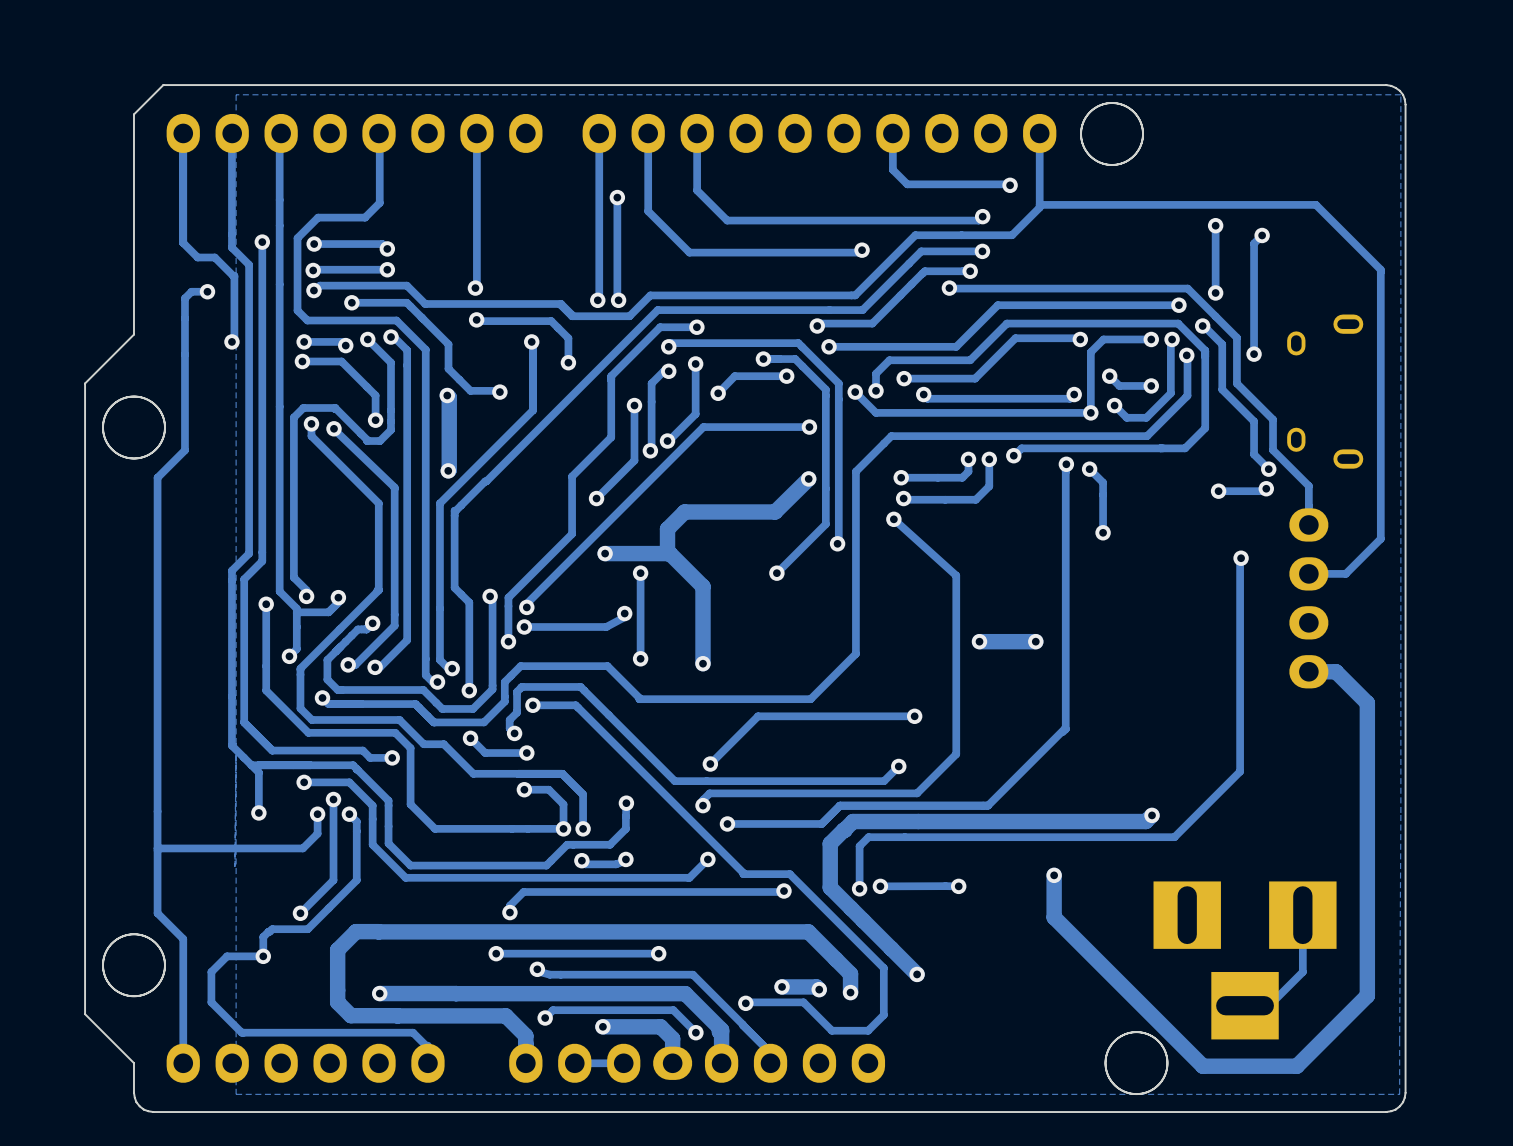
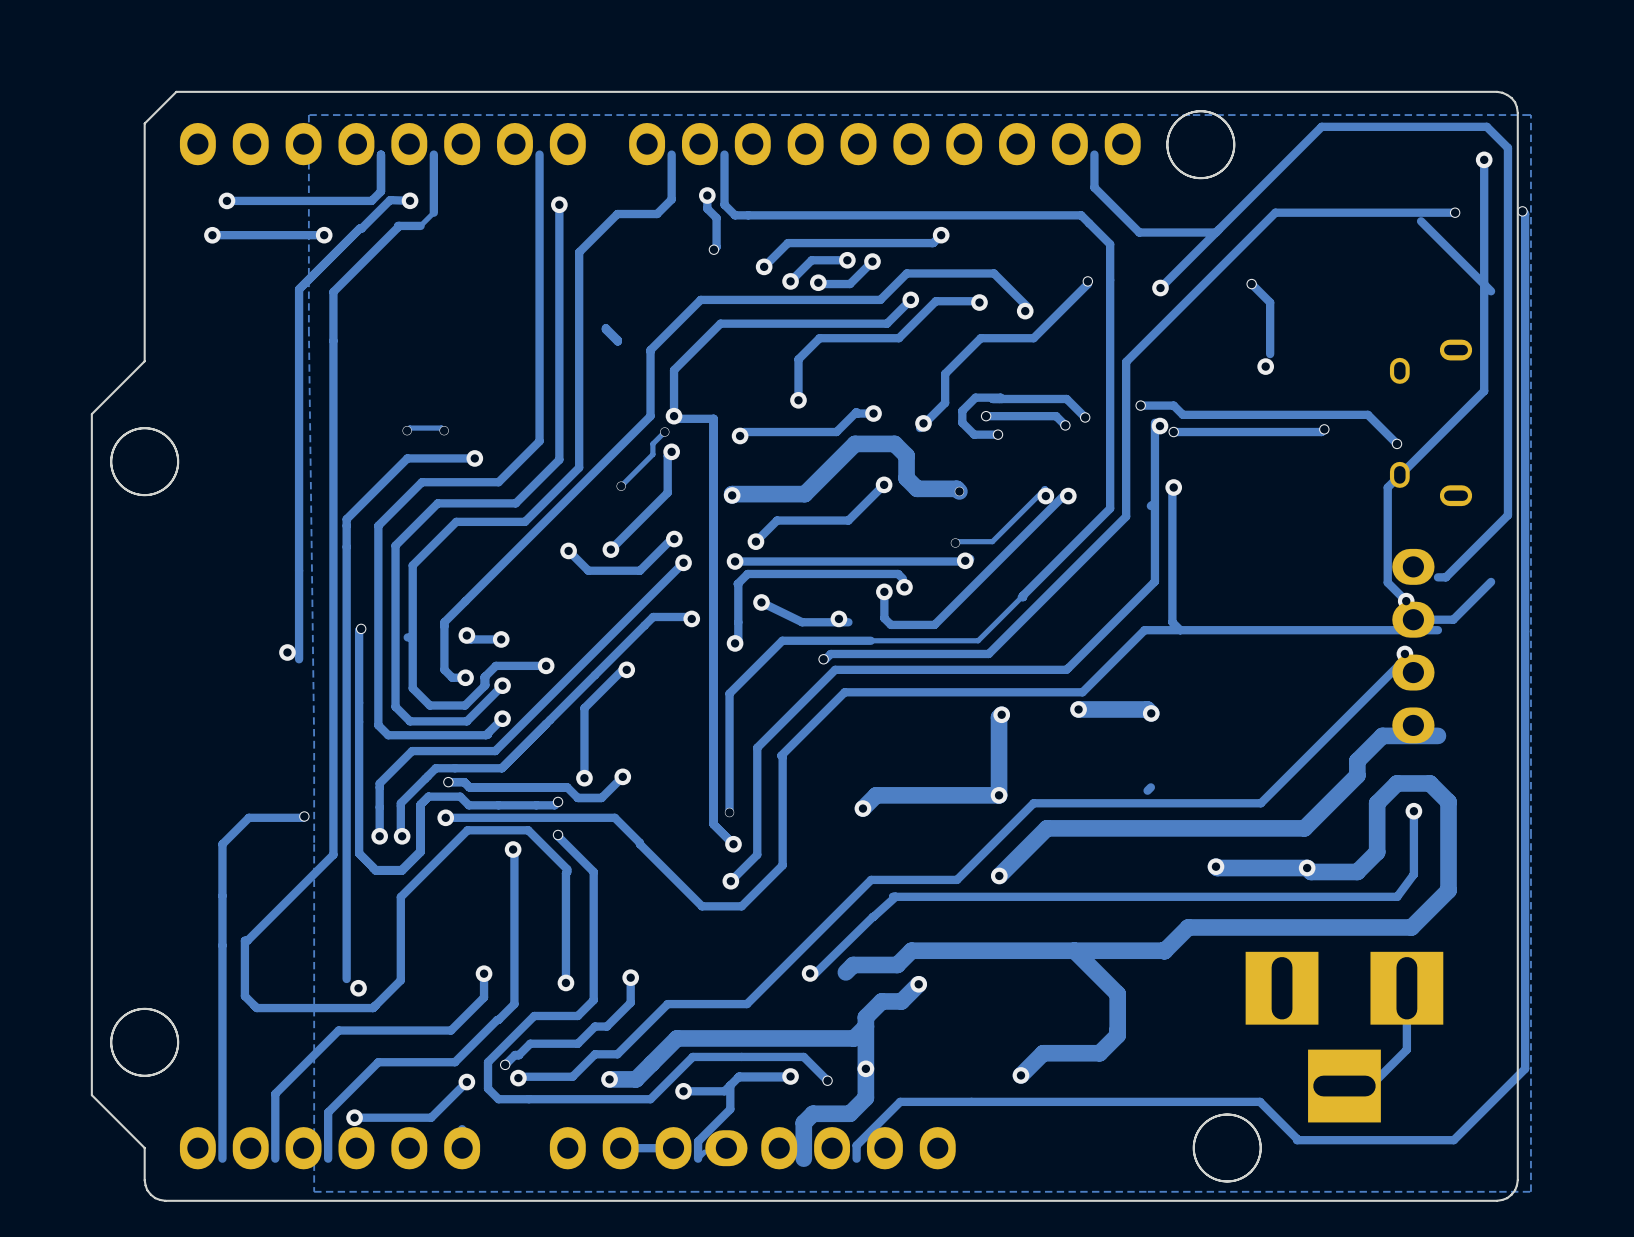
zone outline: (1400, 94) (1399, 1094) (236, 1094) (236, 94) (1400, 94) -> (1530, 115) (1530, 1191) (314, 1191) (314, 741) (308, 329) (308, 115) (1530, 115)
track: (183, 133) (183, 242) (197, 257) (214, 257) (234, 275) (234, 339) (231, 341) -> none
track: (231, 133) (231, 247) (249, 264) (249, 553) (231, 570) (231, 745) (258, 772) (258, 812) (260, 811) -> none
track: (379, 133) (379, 202) (365, 217) (318, 217) (297, 238) (297, 310) (307, 320) (396, 320) (425, 349) (425, 675) (432, 682) (437, 682) -> none
track: (476, 133) (475, 288) -> none
track: (599, 133) (597, 300) -> none
track: (648, 133) (648, 211) (689, 252) (859, 252) (862, 250) -> none
track: (697, 133) (697, 190) (727, 220) (978, 220) (982, 216) -> none
track: (892, 133) (892, 169) (907, 184) (1010, 185) -> none
track: (1039, 133) (1039, 207) (1012, 235) (915, 235) (855, 295) (650, 295) (629, 316) (572, 316) -> none
track: (281, 134) (279, 134) (279, 591) (296, 608) (296, 649) (289, 656) -> none
track: none -> (381, 154) (381, 191) (371, 200) (226, 200)
track: none -> (539, 154) (539, 441) (498, 482) (421, 482) (378, 525) (378, 725) (388, 735) (486, 735) (502, 718)
track: none -> (671, 154) (671, 199) (657, 214) (617, 214) (579, 252) (579, 467) (525, 521) (456, 521) (412, 565) (412, 688) (429, 705) (465, 705) (485, 685) (485, 676)
track: none -> (1094, 154) (1094, 187) (1139, 232) (1215, 232)
track: none -> (1484, 159) (1484, 391) (1387, 487) (1387, 582) (1406, 601)
via: none -> (1484, 159)
track: none -> (707, 195) (707, 208) (716, 217) (716, 247) (713, 249)
track: none -> (410, 200) (390, 200) (299, 289) (299, 659)
via: none -> (410, 200)
via: (1010, 185) -> none
via: none -> (226, 200)
track: none -> (559, 204) (559, 459) (515, 503) (437, 503) (395, 545) (395, 706) (410, 721) (466, 721) (502, 685)
via: none -> (559, 204)
track: none -> (724, 204) (735, 215) (1081, 215) (1110, 244) (1110, 508) (978, 640) (782, 640) (729, 693) (729, 812)
track: none -> (724, 204) (724, 154) (724, 204)
track: none -> (1522, 211) (1525, 214) (1525, 1068) (1453, 1140) (1297, 1140) (1260, 1101) (900, 1101) (856, 1145) (856, 1158)
via: none -> (1522, 211)
track: none -> (433, 212) (433, 154) (433, 212)
track: none -> (433, 212) (420, 225) (398, 225) (333, 291) (333, 854) (247, 940) (244, 940)
track: none -> (1455, 212) (1275, 212) (1126, 362) (1126, 516) (988, 653) (830, 653) (823, 659)
via: none -> (1455, 212)
track: (617, 197) (618, 300) -> none
via position: (617, 197) -> (707, 195)
track: (1315, 204) (1039, 204) -> none
via: (982, 216) -> none
via: none -> (212, 235)
track: none -> (324, 235) (212, 235)
via: none -> (324, 235)
track: none -> (941, 235) (933, 243) (787, 243) (764, 266)
via: none -> (941, 235)
track: (1215, 225) (1215, 292) -> none
via: (1215, 225) -> none
via: none -> (713, 249)
track: (1262, 235) (1254, 243) (1254, 354) -> none
via: (1262, 235) -> none
track: none -> (847, 260) (811, 260) (790, 281)
via: none -> (847, 260)
track: (262, 242) (262, 561) (244, 579) (244, 722) (272, 750) (362, 750) (370, 757) (392, 757) -> none
via: (262, 242) -> none
track: none -> (872, 261) (850, 284) (818, 282)
via: none -> (872, 261)
track: (314, 244) (382, 244) (387, 248) -> none
via: (314, 244) -> none
via: none -> (764, 266)
via: (387, 248) -> none
via: (862, 250) -> none
track: (982, 251) (921, 251) (862, 310) (657, 310) (454, 510) (454, 587) (469, 602) (469, 690) -> none
via: (982, 251) -> none
via: none -> (790, 281)
track: none -> (1087, 281) (1087, 284) (1033, 338) (980, 338) (945, 373) (945, 402) (920, 428)
via: none -> (1087, 281)
via: none -> (818, 282)
track: none -> (1251, 284) (1270, 302) (1270, 354)
via: none -> (1251, 284)
track: none -> (1160, 288) (1321, 126) (1486, 126) (1507, 147) (1507, 515) (1445, 577) (1437, 577)
via: none -> (1160, 288)
track: (387, 269) (313, 270) -> none
via: (387, 269) -> none
track: (1380, 269) (1380, 538) -> none
via: (313, 270) -> none
track: (970, 271) (924, 271) (922, 273) -> none
via: (970, 271) -> none
track: (922, 273) (872, 323) (819, 323) (817, 326) -> none
track: none -> (910, 299) (887, 323) (720, 323) (674, 370) (674, 416) (676, 418) (713, 418) (713, 824) (733, 844)
via: none -> (910, 299)
track: none -> (979, 302) (935, 301) (898, 338) (819, 338) (798, 359) (798, 400)
via: none -> (979, 302)
track: none -> (1027, 306) (994, 273) (906, 273) (880, 299) (700, 299) (650, 350) (650, 416) (444, 622) (444, 669) (452, 677) (465, 677) (465, 681)
via: (475, 288) -> none
track: (949, 288) (1187, 288) (1236, 337) (1236, 383) (1273, 419) (1273, 450) (1308, 486) (1308, 524) -> none
track: (313, 290) (320, 285) (406, 285) (425, 303) (561, 303) -> none
via: (313, 290) -> none
track: (207, 291) (191, 291) (184, 298) (184, 450) (157, 477) (157, 913) (183, 938) (183, 1063) -> none
via: (207, 291) -> none
via: (1215, 292) -> none
via: (597, 300) -> none
via: (618, 300) -> none
track: (349, 302) (406, 302) (448, 344) (448, 368) (470, 390) (499, 392) -> none
via: (351, 302) -> none
track: (1178, 305) (997, 305) (956, 346) (829, 346) -> none
via: (1178, 305) -> none
track: (476, 319) (551, 321) (568, 338) (568, 362) (567, 361) -> none
via: (476, 319) -> none
via: (817, 326) -> none
track: (1202, 326) (1222, 344) (1222, 389) (1254, 421) (1254, 454) (1268, 469) -> none
via: (1202, 326) -> none
track: (696, 327) (660, 327) (611, 376) (611, 437) (572, 476) (572, 534) (508, 597) (508, 641) -> none
via: (696, 327) -> none
track: (391, 337) (393, 337) (407, 350) (407, 640) (380, 667) (375, 667) -> none
via: (391, 337) -> none
track: (367, 339) (391, 362) (391, 430) (380, 441) (367, 441) (335, 407) -> none
via: (367, 339) -> none
track: (1080, 339) (1015, 338) (975, 378) (904, 378) -> none
via: (1080, 339) -> none
track: (1151, 339) (1103, 339) (1090, 352) (1090, 412) (876, 412) (855, 392) -> none
via: (1151, 339) -> none
track: (1172, 339) (1170, 393) (1146, 417) (1126, 417) (1114, 405) -> none
via: (231, 341) -> none
track: (304, 341) (342, 341) (345, 345) -> none
via: (304, 341) -> none
track: (531, 341) (532, 410) (439, 503) (439, 660) (448, 668) (452, 668) -> none
via: (531, 341) -> none
via: (345, 345) -> none
track: (668, 346) (671, 343) (798, 343) (838, 383) (837, 543) -> none
via: (668, 346) -> none
via: (829, 346) -> none
via: (1254, 354) -> none
track: (1186, 355) (1187, 395) (1147, 436) (891, 436) (855, 471) (855, 653) (810, 699) (639, 699) (607, 666) (520, 666) (504, 682) (504, 701) (483, 722) (433, 722) (415, 704) (328, 704) (322, 697) -> none
via: (1186, 355) -> none
track: (763, 359) (795, 359) (825, 389) (825, 524) (776, 573) -> none
via: (763, 359) -> none
track: (302, 361) (341, 361) (375, 395) (375, 420) -> none
via: (302, 361) -> none
via: (568, 362) -> none
track: (695, 362) (695, 414) (667, 441) -> none
via: (695, 363) -> none
track: none -> (992, 398) (1066, 398) (1085, 417)
track: none -> (1001, 398) (975, 397) (962, 410) (962, 422) (974, 434) (997, 434)
via: none -> (798, 400)
track: (668, 371) (663, 371) (651, 383) (650, 450) -> none
via: (668, 371) -> none
track: none -> (1140, 405) (1173, 405) (1182, 414) (1367, 414) (1396, 443)
via: none -> (1140, 405)
track: (786, 376) (734, 376) (718, 393) -> none
via: (786, 376) -> none
track: (1109, 376) (1119, 385) (1151, 385) -> none
via: (1109, 376) -> none
via: (904, 378) -> none
track: none -> (873, 413) (856, 412) (836, 432) (744, 432) (740, 435)
via: none -> (873, 413)
via: none -> (674, 416)
track: none -> (986, 416) (1056, 416) (1065, 425)
via: none -> (986, 416)
via: (1151, 385) -> none
via: none -> (1085, 417)
track: (876, 390) (876, 373) (889, 360) (970, 360) (1006, 323) (1178, 323) (1205, 350) (1205, 428) (1185, 448) (1021, 448) (1013, 455) -> none
via: (876, 390) -> none
track: none -> (1154, 422) (1154, 581) (1068, 668)
via: (499, 392) -> none
via: (718, 393) -> none
via: none -> (1065, 425)
via: (923, 394) -> none
track: (1074, 394) (1069, 398) (927, 398) (923, 394) -> none
track: (447, 395) (449, 397) (448, 470) -> none
via: (447, 395) -> none
track: none -> (1324, 429) (1321, 432) (1173, 432)
via: none -> (1324, 429)
via: none -> (407, 430)
track: none -> (444, 430) (441, 428) (409, 428) (407, 430)
via: none -> (444, 430)
track: none -> (664, 432) (652, 443) (652, 454) (621, 486)
via: none -> (664, 432)
via: none -> (1173, 432)
via: none -> (997, 434)
via: none -> (740, 435)
track: (634, 405) (634, 460) (596, 498) -> none
via position: (634, 405) -> (671, 451)
via: (1114, 405) -> none
track: (335, 407) (303, 407) (293, 417) (293, 577) (306, 590) (306, 596) -> none
via: none -> (1396, 443)
via: (1090, 412) -> none
track: none -> (671, 451) (667, 455) (667, 492) (610, 549)
via: (375, 420) -> none
track: (311, 423) (311, 436) (378, 503) (378, 590) (300, 668) (300, 708) (311, 719) (399, 719) (423, 744) (443, 744) (473, 773) (562, 773) (583, 794) (583, 828) -> none
via: (311, 423) -> none
track: none -> (474, 458) (407, 458) (346, 519) (346, 978)
via: none -> (474, 458)
track: (809, 427) (703, 427) (526, 603) (526, 607) -> none
via: (809, 427) -> none
track: (334, 428) (394, 487) (394, 625) (355, 664) (348, 664) -> none
via: (334, 428) -> none
via: (667, 441) -> none
track: none -> (884, 484) (848, 520) (777, 520) (755, 541)
via: none -> (884, 484)
via: none -> (621, 486)
via: (650, 450) -> none
track: none -> (1173, 487) (1172, 622) (1180, 630)
via: none -> (1173, 487)
track: none -> (1043, 488) (992, 541) (955, 543)
track: none -> (959, 491) (956, 488) (917, 488) (906, 478) (906, 455) (894, 443) (855, 443) (804, 494) (732, 495)
via: none -> (959, 491)
via: (1013, 455) -> none
via: none -> (732, 495)
track: (968, 459) (968, 471) (962, 477) (901, 477) -> none
track: (989, 459) (989, 486) (975, 499) (903, 498) -> none
track: none -> (1062, 496) (934, 624)
track: (1066, 464) (1065, 729) (988, 805) (840, 805) (821, 823) (727, 823) -> none
via: (1066, 464) -> none
track: (1089, 469) (1103, 482) (1103, 532) -> none
via: (1089, 469) -> none
via: (1268, 469) -> none
via: (448, 470) -> none
via: (901, 477) -> none
track: (808, 478) (775, 511) (684, 511) (667, 529) (667, 553) -> none
via: (808, 478) -> none
track: (1266, 488) (1263, 491) (1218, 491) -> none
via: (1266, 488) -> none
via: (1218, 491) -> none
via: (596, 498) -> none
via: (903, 498) -> none
track: none -> (674, 539) (671, 539) (639, 570) (588, 570) (568, 550)
via: none -> (674, 539)
via: none -> (755, 541)
via: none -> (955, 543)
via: none -> (610, 549)
via: none -> (568, 550)
track: none -> (970, 558) (967, 561) (735, 561)
via: none -> (735, 561)
track: (893, 519) (956, 575) -> none
track: none -> (683, 562) (495, 751) (412, 751) (379, 783) (379, 836)
via: none -> (683, 562)
via: (1103, 532) -> none
track: none -> (902, 578) (898, 573) (747, 573) (737, 583) (738, 640) (735, 643)
track: none -> (884, 591) (884, 618) (890, 624) (934, 624)
via: none -> (884, 591)
track: (605, 553) (669, 553) (703, 586) (703, 663) -> none
via: (605, 553) -> none
via: none -> (1406, 601)
track: none -> (761, 602) (802, 622) (848, 622)
via: none -> (761, 602)
track: (1241, 558) (1240, 771) (1174, 837) (868, 837) (859, 846) (859, 888) -> none
via: (1241, 558) -> none
track: none -> (690, 616) (653, 616) (501, 768) (435, 768) (400, 803) (402, 836)
track: (640, 573) (640, 658) -> none
track: (956, 575) (956, 754) -> none
track: none -> (361, 628) (359, 630) (359, 853) (375, 870) (401, 870) (420, 850)
via: none -> (361, 628)
track: none -> (1437, 630) (1144, 630) (1082, 692) (844, 692) (781, 755) (782, 865) (741, 906) (702, 906) (614, 817) (445, 817)
track: none -> (466, 635) (470, 639) (501, 638)
via: none -> (466, 635)
via: none -> (501, 639)
via: none -> (735, 643)
via: (306, 596) -> none
track: (338, 596) (338, 602) (328, 612) (296, 612) -> none
track: (490, 596) (492, 598) (492, 689) (472, 708) (442, 708) (423, 690) (337, 690) (327, 679) (327, 660) (357, 629) (366, 629) (372, 623) -> none
via: (490, 596) -> none
via: (338, 597) -> none
track: (266, 604) (266, 690) (308, 732) (395, 732) (410, 748) (410, 804) (435, 828) (563, 828) (563, 804) (548, 789) (524, 789) -> none
track: none -> (1404, 653) (1403, 660) (1260, 803) (1033, 803) (957, 879) (871, 879) (746, 1004) (667, 1004) (617, 1054) (595, 1054) (572, 1076) (518, 1078)
via: none -> (1404, 653)
via: (526, 607) -> none
via: none -> (823, 659)
track: (624, 613) (624, 617) (606, 626) (524, 626) -> none
via: (624, 613) -> none
track: none -> (546, 665) (495, 665) (484, 677) (484, 686)
via: none -> (546, 665)
track: none -> (1067, 668) (835, 669) (757, 747) (757, 854) (730, 881)
track: none -> (626, 669) (622, 669) (584, 708) (584, 778)
via: none -> (626, 669)
via: (372, 623) -> none
via: (524, 626) -> none
via: none -> (465, 677)
via: none -> (502, 685)
via: (508, 641) -> none
via: (979, 641) -> none
track: (1035, 641) (979, 641) -> none
via: (1035, 641) -> none
via: (289, 656) -> none
track: none -> (1078, 709) (1147, 709) (1151, 713)
via: none -> (1078, 709)
via: (640, 658) -> none
via: none -> (1151, 713)
track: none -> (1001, 714) (999, 717) (999, 795) (876, 795) (862, 808)
via: none -> (1001, 714)
via: (703, 663) -> none
via: (348, 664) -> none
via: (375, 667) -> none
via position: (452, 668) -> (502, 718)
track: (1308, 671) (1336, 671) (1367, 703) (1367, 995) (1296, 1066) (1202, 1066) (1054, 917) (1054, 875) -> none
track: none -> (1437, 735) (1382, 735) (1357, 761) (1357, 775) (1304, 828) (1046, 828) (999, 875)
via: (437, 682) -> none
via: (469, 690) -> none
via: (322, 697) -> none
track: (532, 705) (575, 705) (743, 874) (789, 874) (883, 968) (883, 1015) (868, 1030) (831, 1030) (803, 1002) (745, 1003) -> none
via position: (532, 705) -> (584, 778)
track: (758, 716) (710, 764) (758, 716) -> none
track: (914, 716) (758, 716) -> none
via: (914, 716) -> none
track: none -> (622, 776) (601, 797) (577, 797) (567, 787) (469, 787) (464, 782) (448, 782)
via: none -> (622, 776)
via: none -> (448, 782)
track: (514, 733) (509, 728) (509, 719) (517, 712) (517, 691) (521, 686) (580, 686) (674, 781) (884, 781) (898, 766) -> none
via: (514, 733) -> none
via: none -> (999, 795)
track: (470, 738) (485, 753) (526, 753) -> none
via: (470, 738) -> none
track: none -> (558, 801) (554, 805) (468, 805) (460, 796) (428, 796) (420, 804) (420, 852) (402, 870) (375, 870) (373, 867)
via: none -> (558, 801)
via: none -> (862, 808)
track: none -> (1413, 811) (1413, 874) (1397, 896) (893, 896)
via: none -> (1413, 811)
via: none -> (729, 812)
via: (526, 753) -> none
track: (956, 754) (917, 793) (709, 793) (703, 800) (703, 805) -> none
track: none -> (304, 816) (248, 817) (222, 844) (222, 1158)
via: none -> (304, 816)
via: (392, 757) -> none
via: none -> (445, 817)
via: (710, 764) -> none
track: (251, 765) (353, 765) (388, 800) (388, 843) (410, 865) (546, 865) (567, 844) (610, 844) (625, 828) (626, 803) -> none
via: (898, 766) -> none
track: none -> (558, 834) (593, 871) (593, 1000) (577, 1015) (534, 1015) (488, 1062) (488, 1088) (498, 1099) (650, 1099) (692, 1056) (803, 1056) (827, 1080)
via: none -> (558, 834)
via: none -> (379, 836)
via: none -> (402, 836)
via: none -> (733, 844)
track: (304, 782) (349, 782) (372, 805) (372, 844) (405, 877) (689, 877) (707, 859) -> none
via: (304, 782) -> none
track: none -> (513, 849) (514, 1004) (454, 1062) (378, 1062) (328, 1112) (328, 1158)
via: none -> (513, 849)
via: (524, 789) -> none
track: (333, 799) (333, 880) (300, 913) -> none
via: (333, 799) -> none
track: none -> (1215, 866) (1307, 868) (1311, 871) (1357, 871) (1377, 852) (1377, 803) (1396, 783) (1430, 783) (1448, 801) (1448, 890) (1411, 927) (1188, 927) (1164, 949)
via: (626, 803) -> none
via: none -> (1307, 868)
via: (703, 805) -> none
via: none -> (999, 875)
via: (258, 812) -> none
track: (317, 814) (317, 833) (302, 848) (157, 848) -> none
via: (317, 814) -> none
track: (349, 814) (356, 821) (356, 880) (307, 929) (272, 929) (268, 931) (263, 937) (263, 956) (227, 956) (211, 972) (211, 1002) (241, 1032) (413, 1032) (427, 1047) -> none
via: (349, 814) -> none
track: (1152, 815) (1145, 821) (852, 821) (830, 843) (830, 887) (917, 974) -> none
via position: (1152, 815) -> (1215, 866)
via: none -> (730, 881)
via: (727, 823) -> none
via: (563, 828) -> none
via: (583, 828) -> none
track: none -> (895, 896) (815, 973) (810, 973)
track: (625, 859) (616, 864) (585, 864) (581, 860) -> none
via: (625, 859) -> none
via: (707, 859) -> none
via: (581, 860) -> none
track: none -> (244, 940) (244, 996)
via: (1054, 875) -> none
track: none -> (1164, 950) (911, 950) (897, 964) (853, 964) (845, 972)
track: none -> (1074, 950) (1117, 994) (1117, 1035) (1099, 1053) (1043, 1053) (1020, 1075)
via: (880, 886) -> none
track: (958, 886) (880, 886) -> none
via: (958, 886) -> none
via: (859, 888) -> none
track: (783, 891) (523, 892) (509, 905) (509, 912) -> none
via: (783, 891) -> none
track: none -> (484, 973) (484, 997) (451, 1030) (338, 1030) (275, 1093) (275, 1158)
via: none -> (484, 973)
via: none -> (810, 973)
track: none -> (630, 977) (630, 1002) (606, 1026) (595, 1026) (577, 1043) (530, 1043) (518, 1055)
via: none -> (630, 977)
track: none -> (400, 980) (400, 897) (467, 830) (528, 830) (567, 869) (565, 982)
track: none -> (400, 980) (373, 1008) (256, 1008) (244, 996)
track: none -> (918, 984) (901, 1001) (881, 1001) (865, 1017) (865, 1097) (850, 1113) (813, 1113) (803, 1123) (803, 1158)
via: none -> (918, 984)
via position: (509, 912) -> (565, 982)
via position: (300, 913) -> (358, 988)
track: (378, 931) (356, 931) (337, 949) (337, 1002) (351, 1015) (397, 1015) -> none
track: (378, 931) (808, 931) (850, 973) (850, 992) -> none
track: none -> (865, 1026) (853, 1038) (676, 1038) (635, 1079) (609, 1079)
via: (496, 953) -> none
track: (658, 953) (496, 953) -> none
via: (658, 953) -> none
via: (263, 956) -> none
track: (537, 969) (537, 971) (549, 974) (692, 974) (770, 1052) (770, 1063) -> none
via: (537, 969) -> none
via position: (917, 974) -> (1020, 1075)
track: none -> (519, 1054) (515, 1054) (505, 1064)
via: none -> (505, 1064)
track: (782, 986) (816, 986) (819, 989) -> none
via: (782, 986) -> none
via: none -> (865, 1068)
via: (819, 989) -> none
via: (850, 992) -> none
via: (379, 993) -> none
track: (456, 993) (379, 993) -> none
track: (456, 993) (685, 993) (721, 1030) (719, 1031) (721, 1031) (721, 1063) -> none
track: none -> (738, 1077) (790, 1076) (739, 1076) (724, 1091) (683, 1091) (686, 1088)
via: none -> (518, 1078)
via: none -> (609, 1079)
via: none -> (827, 1080)
track: none -> (466, 1082) (431, 1117) (354, 1117)
via: none -> (466, 1082)
via position: (745, 1003) -> (790, 1076)
track: none -> (730, 1085) (730, 1109) (698, 1141) (698, 1158) (704, 1152)
via: none -> (683, 1091)
track: (397, 1015) (505, 1015) (525, 1035) (525, 1063) -> none
track: (545, 1018) (553, 1010) (673, 1010) (695, 1032) -> none
via: (545, 1018) -> none
track: (602, 1026) (660, 1026) (672, 1038) (672, 1063) -> none
via: (602, 1026) -> none
via: (695, 1032) -> none
via: none -> (354, 1117)

